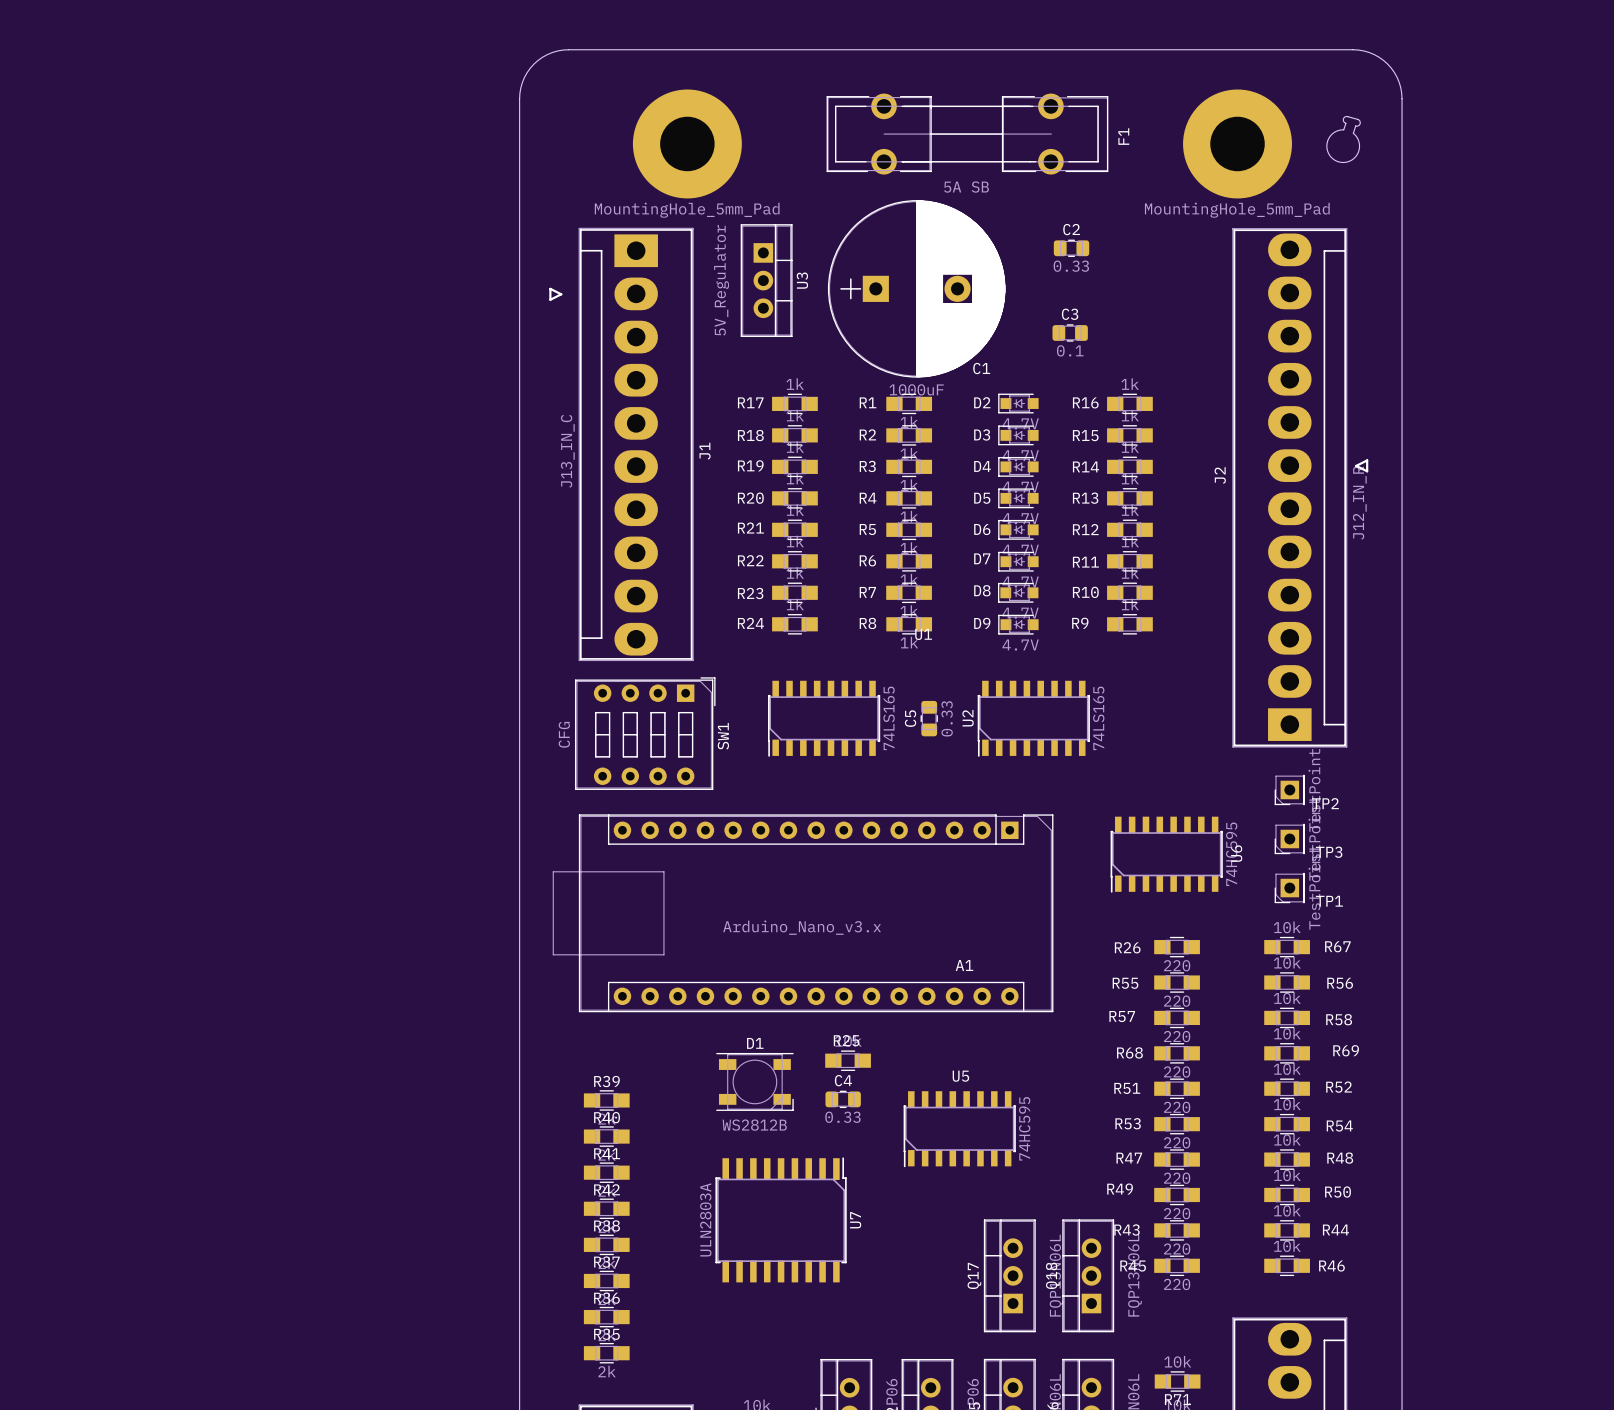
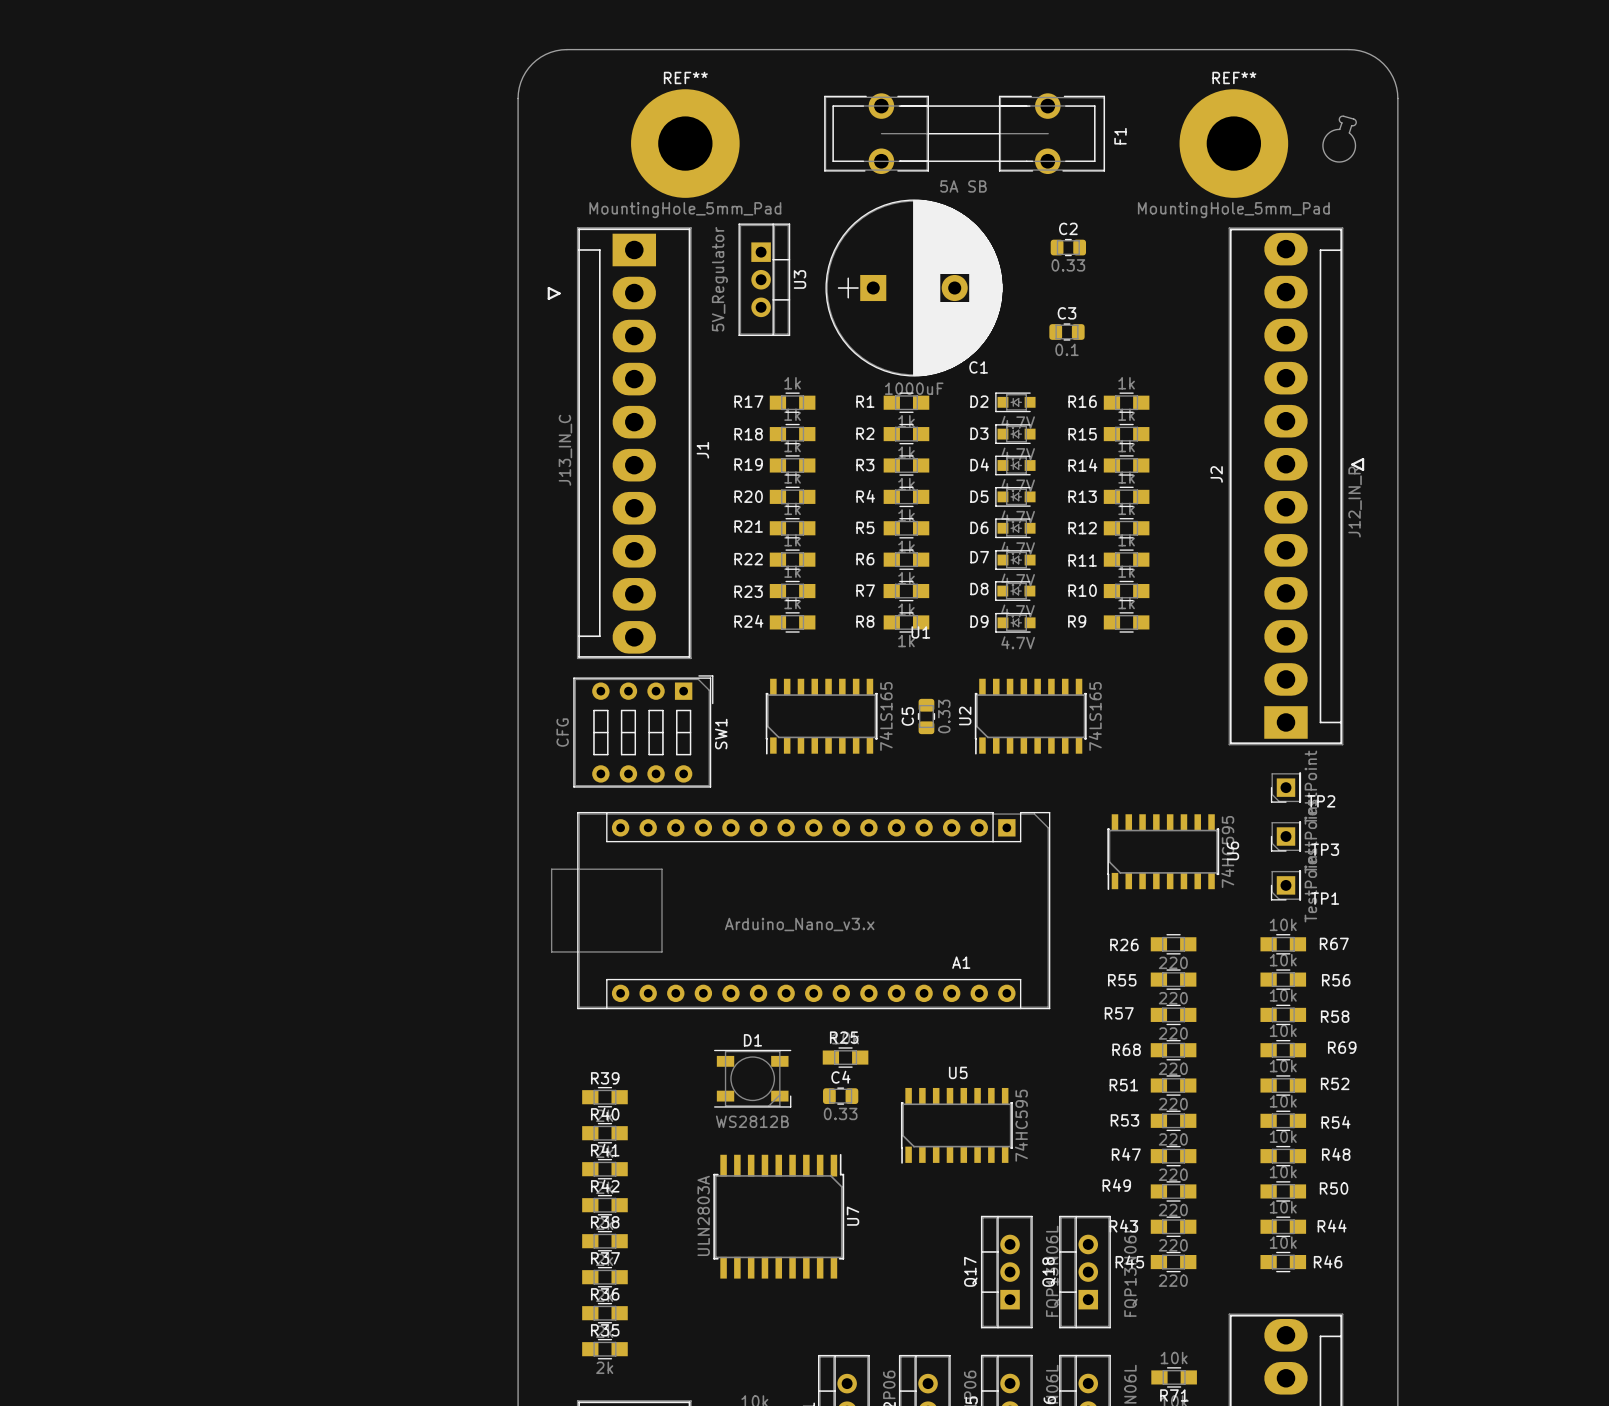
REF** name: none -> REF** (685, 77)
REF** name: none -> REF** (1234, 77)

